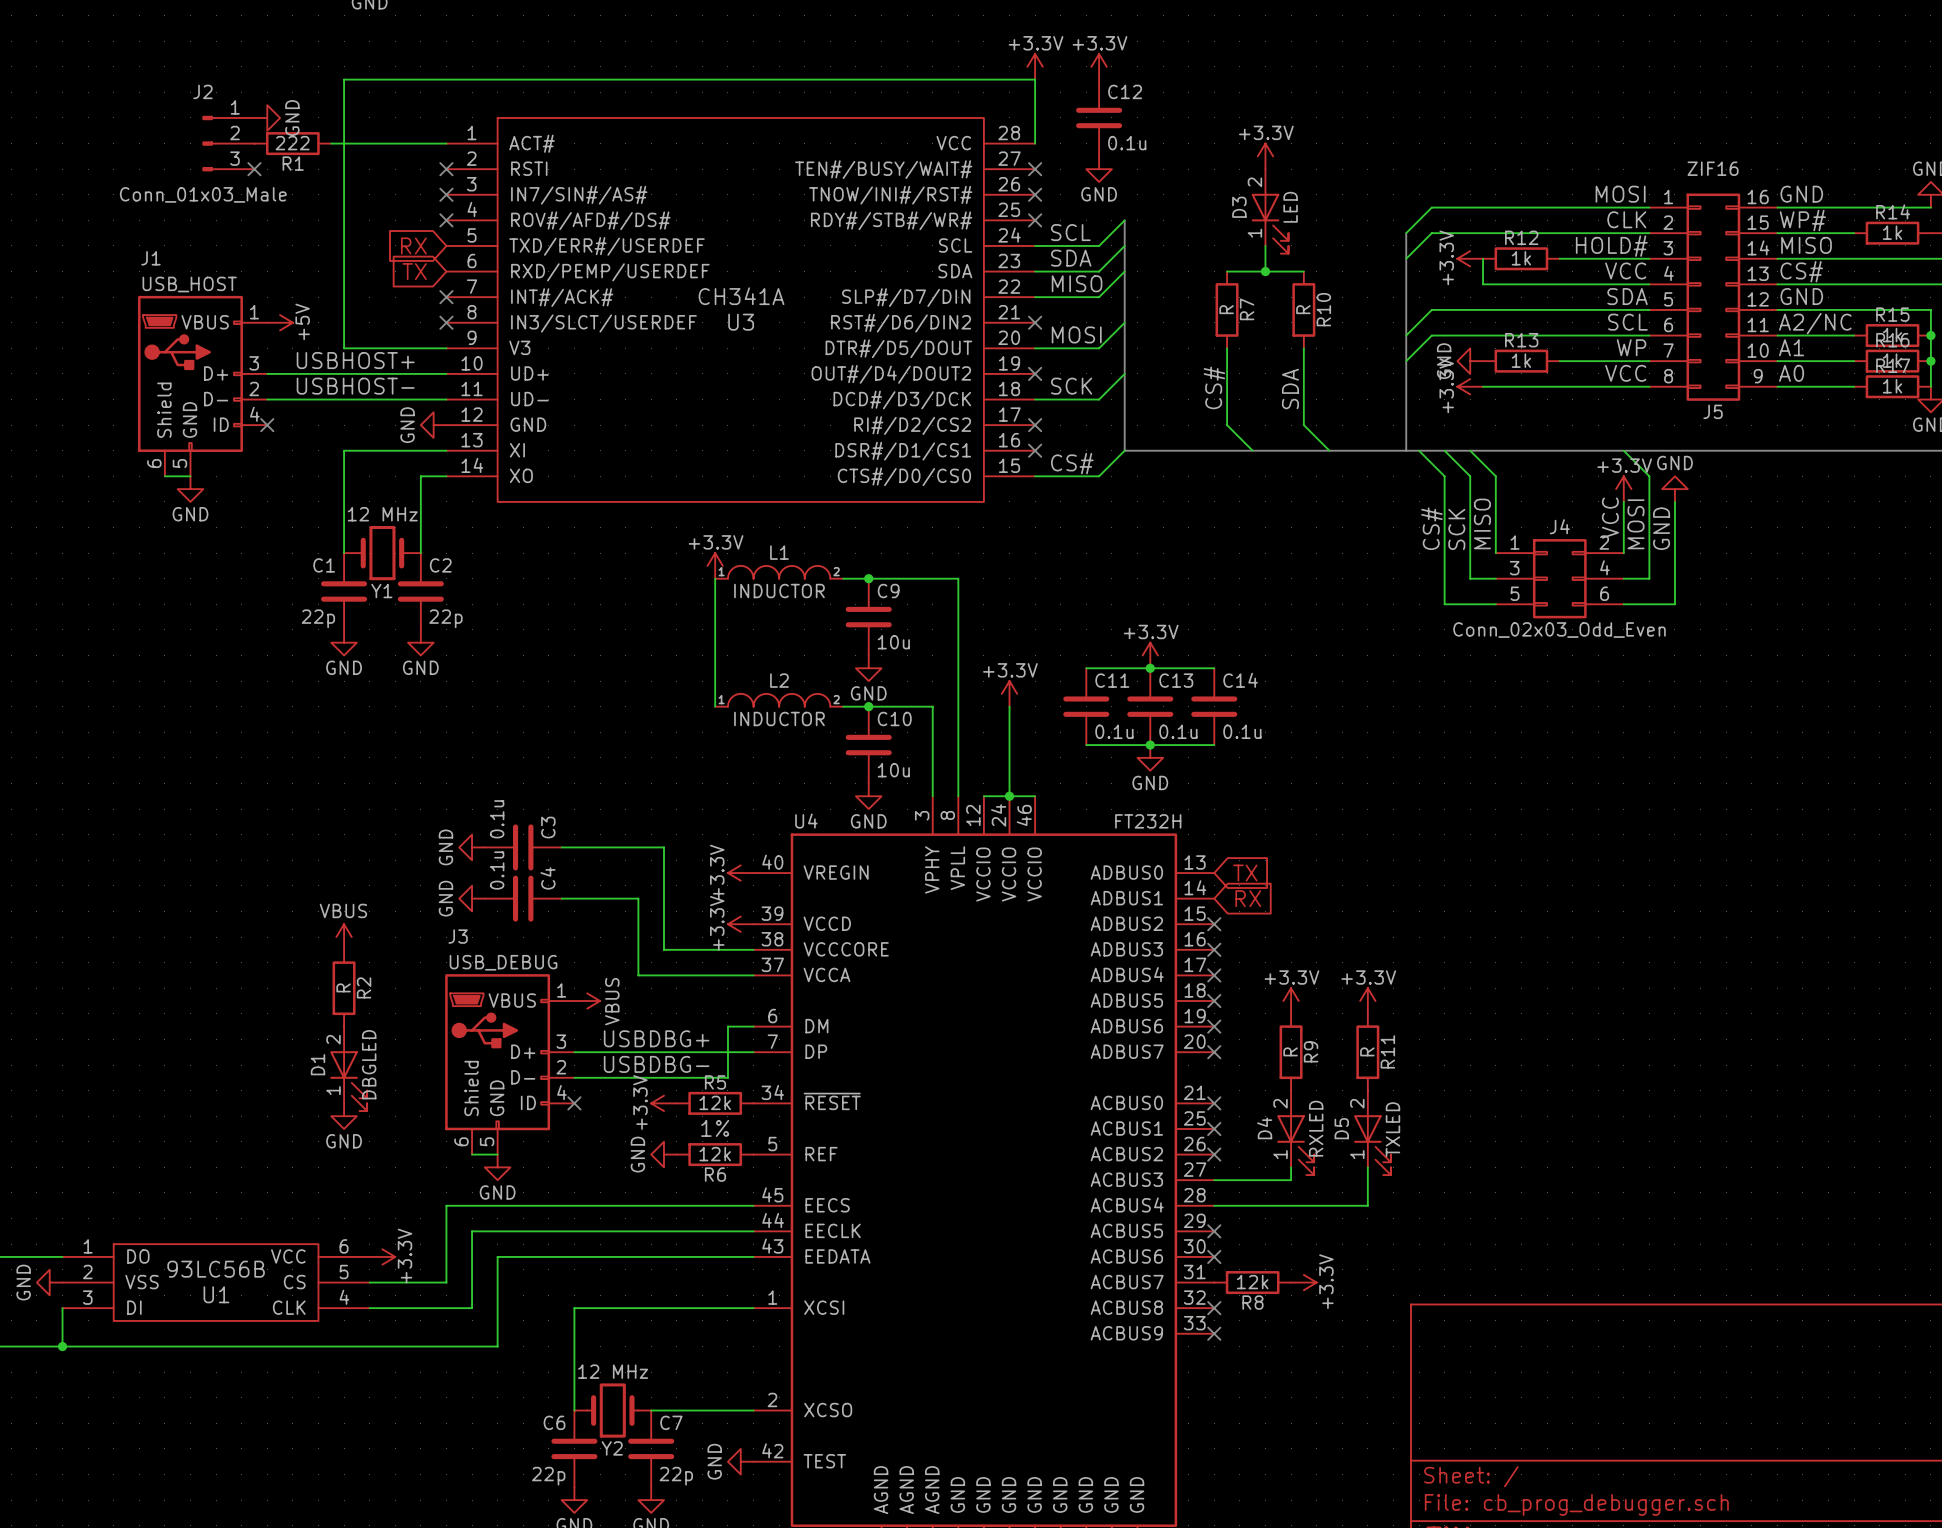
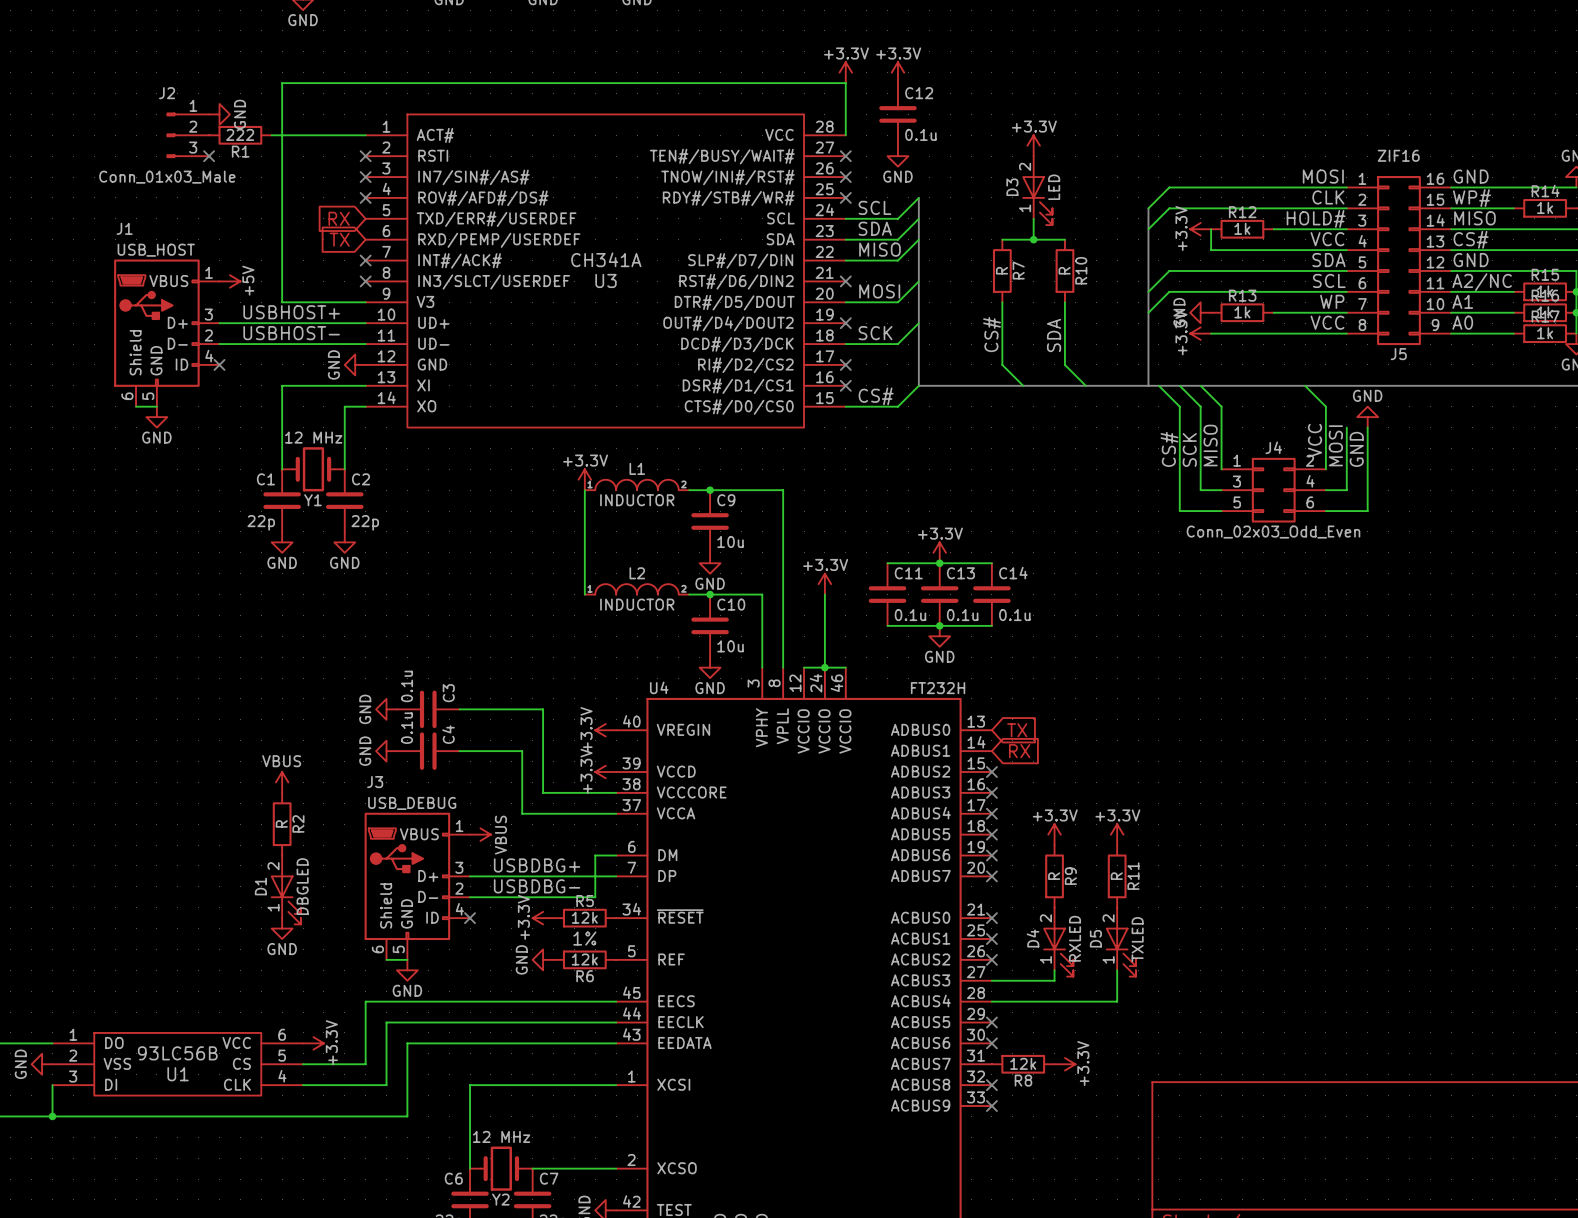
wire: (1623, 450) (1649, 476) (1649, 501) -> (1305, 385) (1325, 406) (1325, 427)
power symbol: +3.3V (1623, 489) -> none

